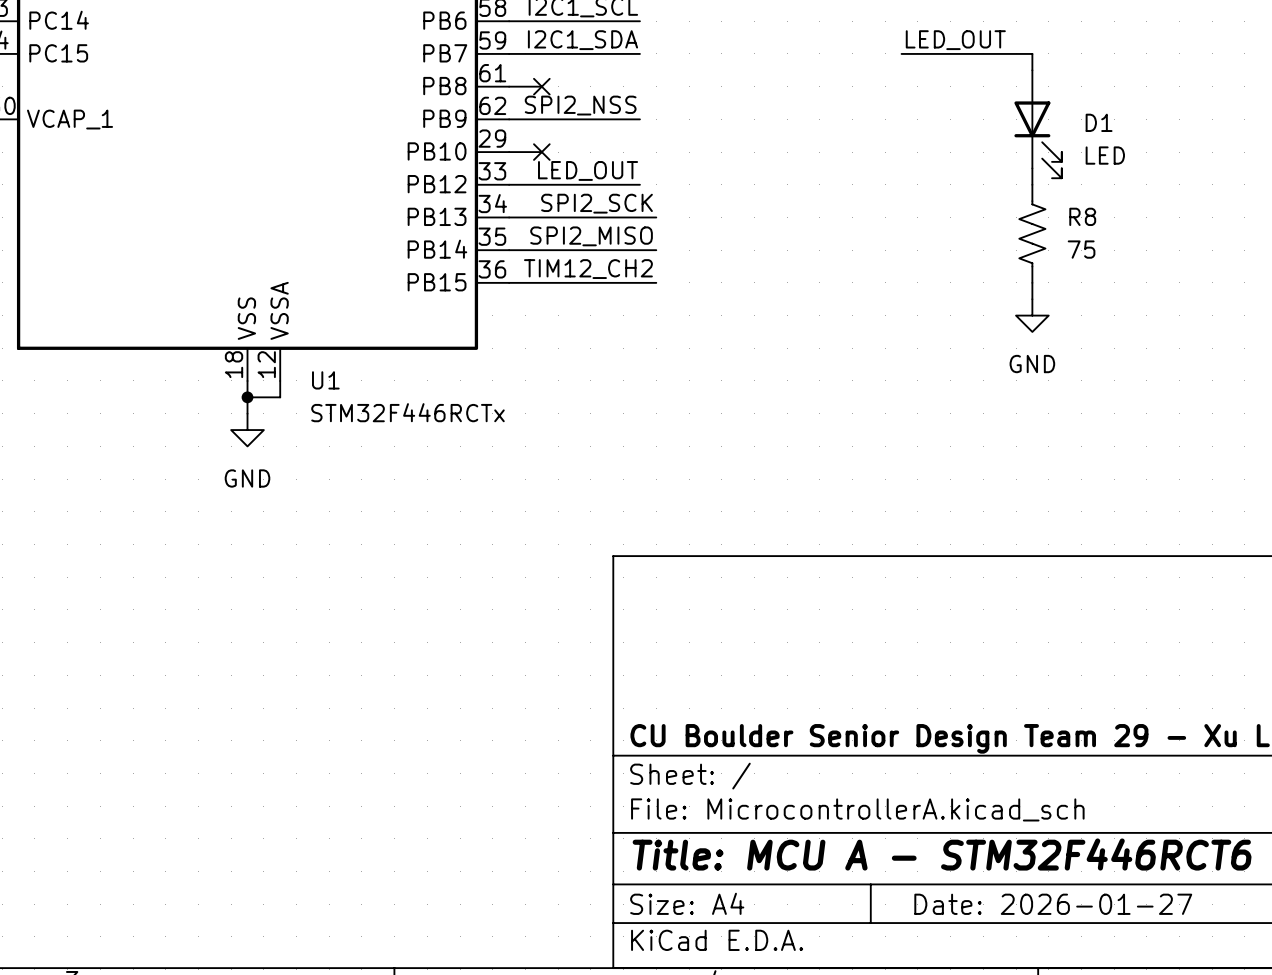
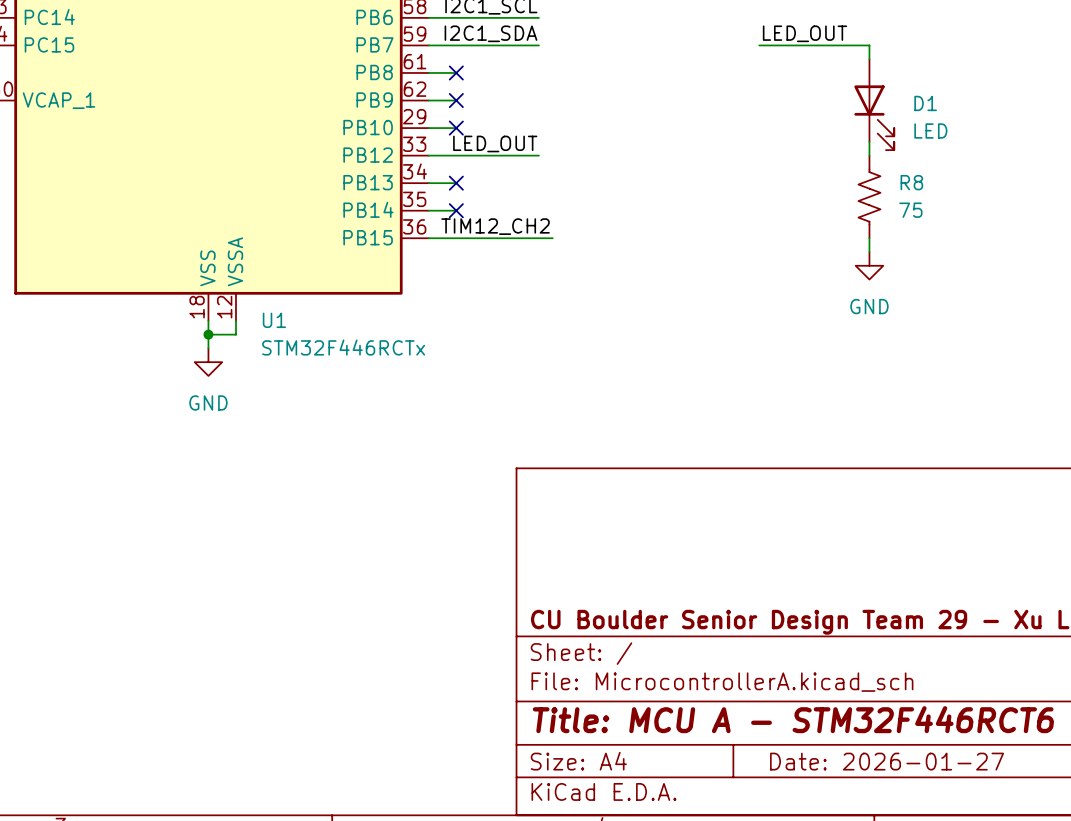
label: SPI2_NSS (580, 105) -> none
wire: (541, 119) (639, 119) -> none
no-connect mark: none -> (456, 100)
label: SPI2_SCK (596, 203) -> none
wire: (541, 217) (656, 217) -> none
no-connect mark: none -> (456, 183)
label: SPI2_MISO (591, 236) -> none
wire: (541, 250) (656, 250) -> none
no-connect mark: none -> (456, 210)

